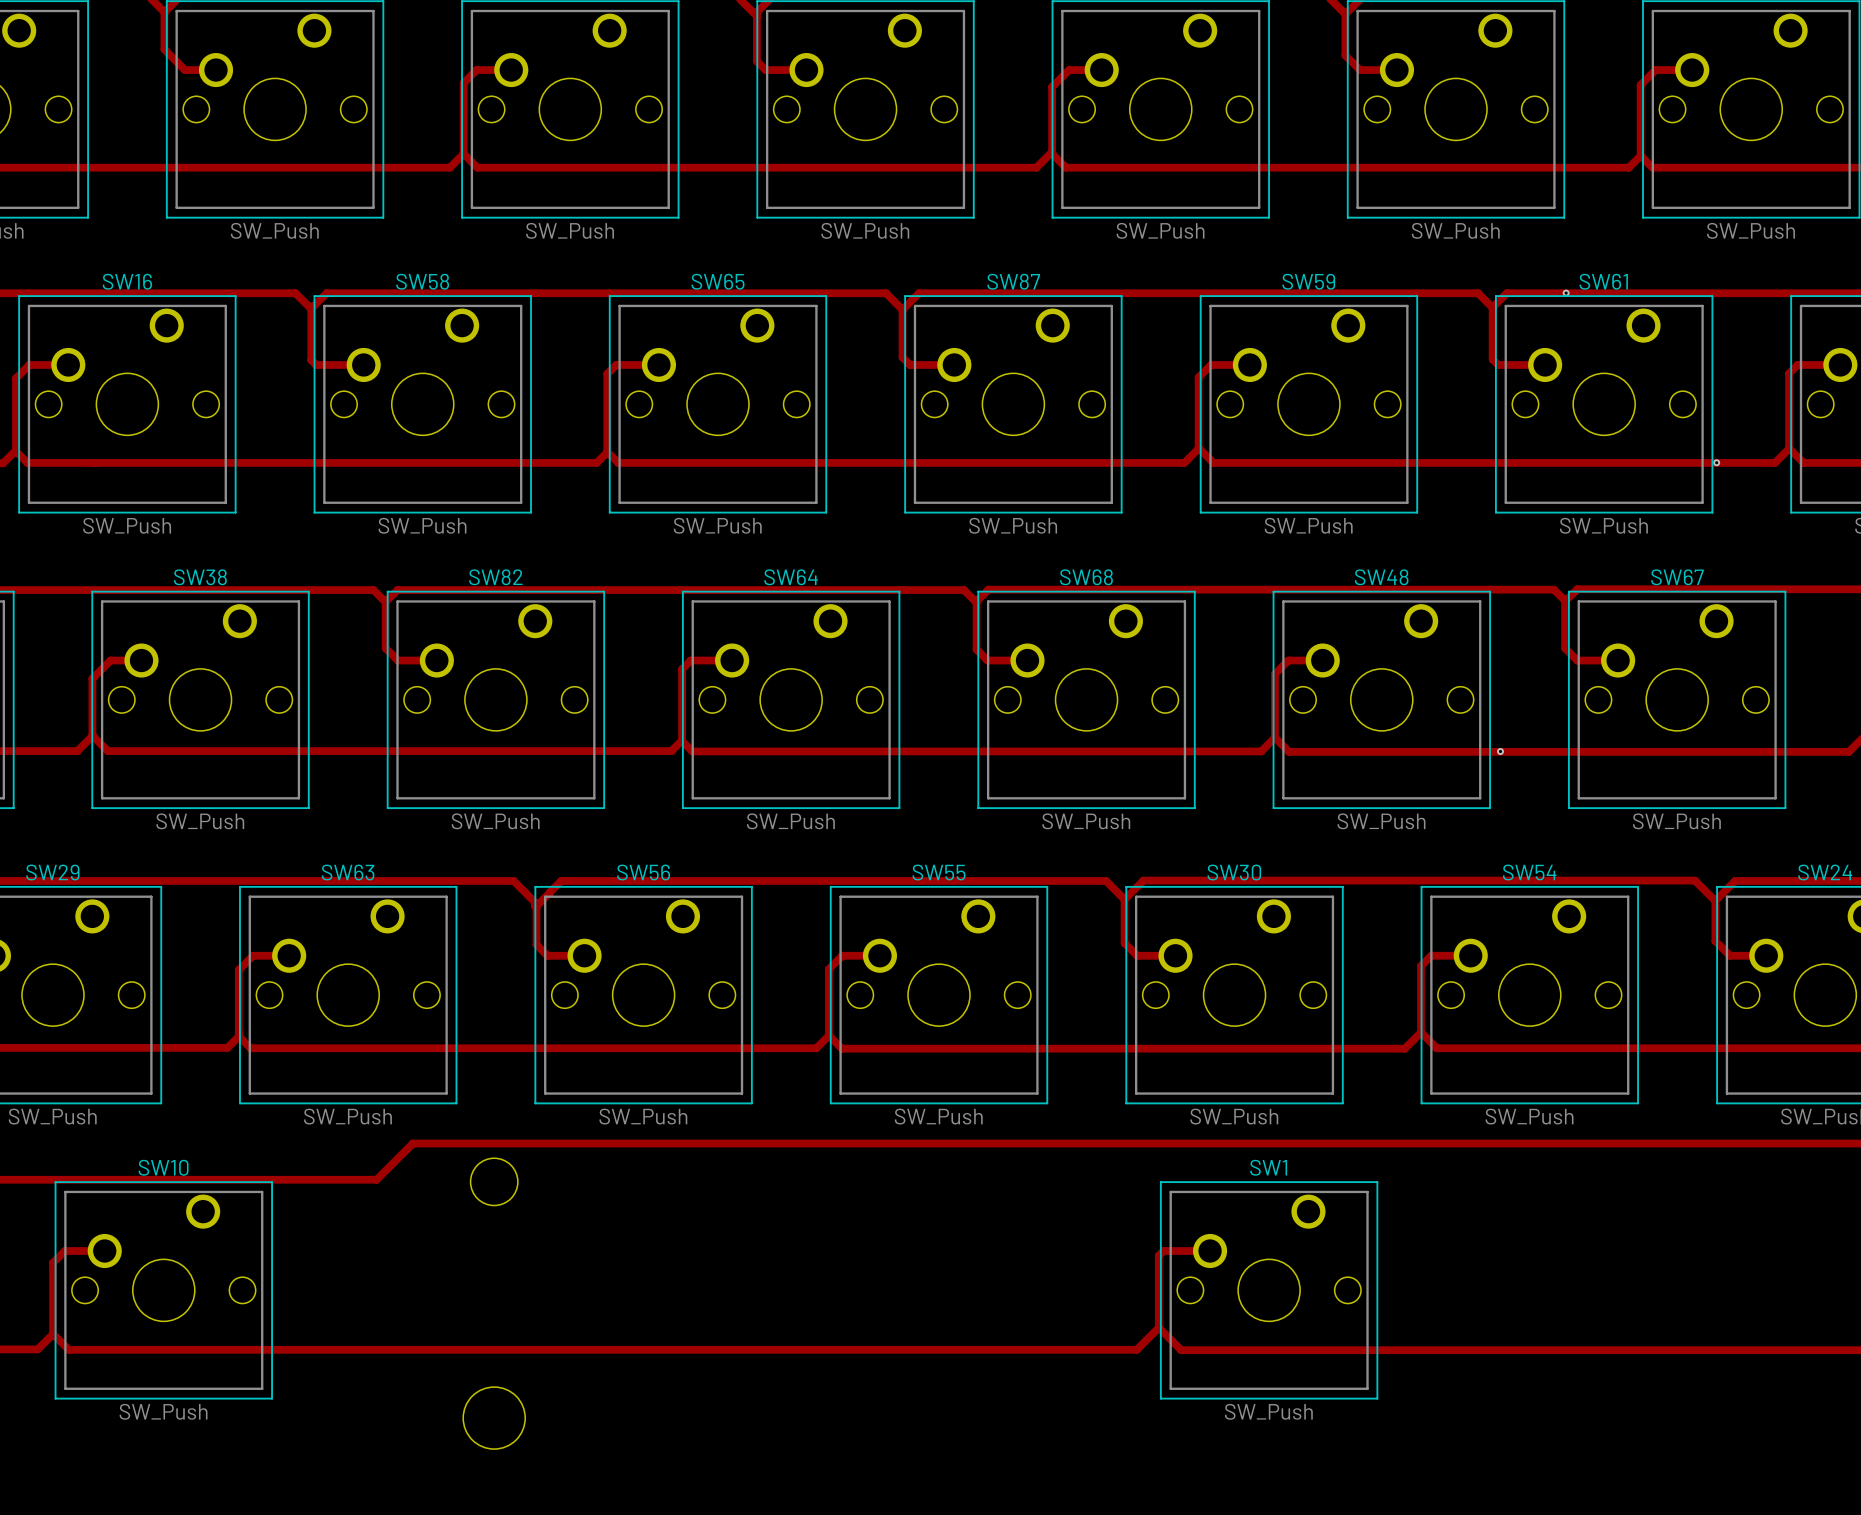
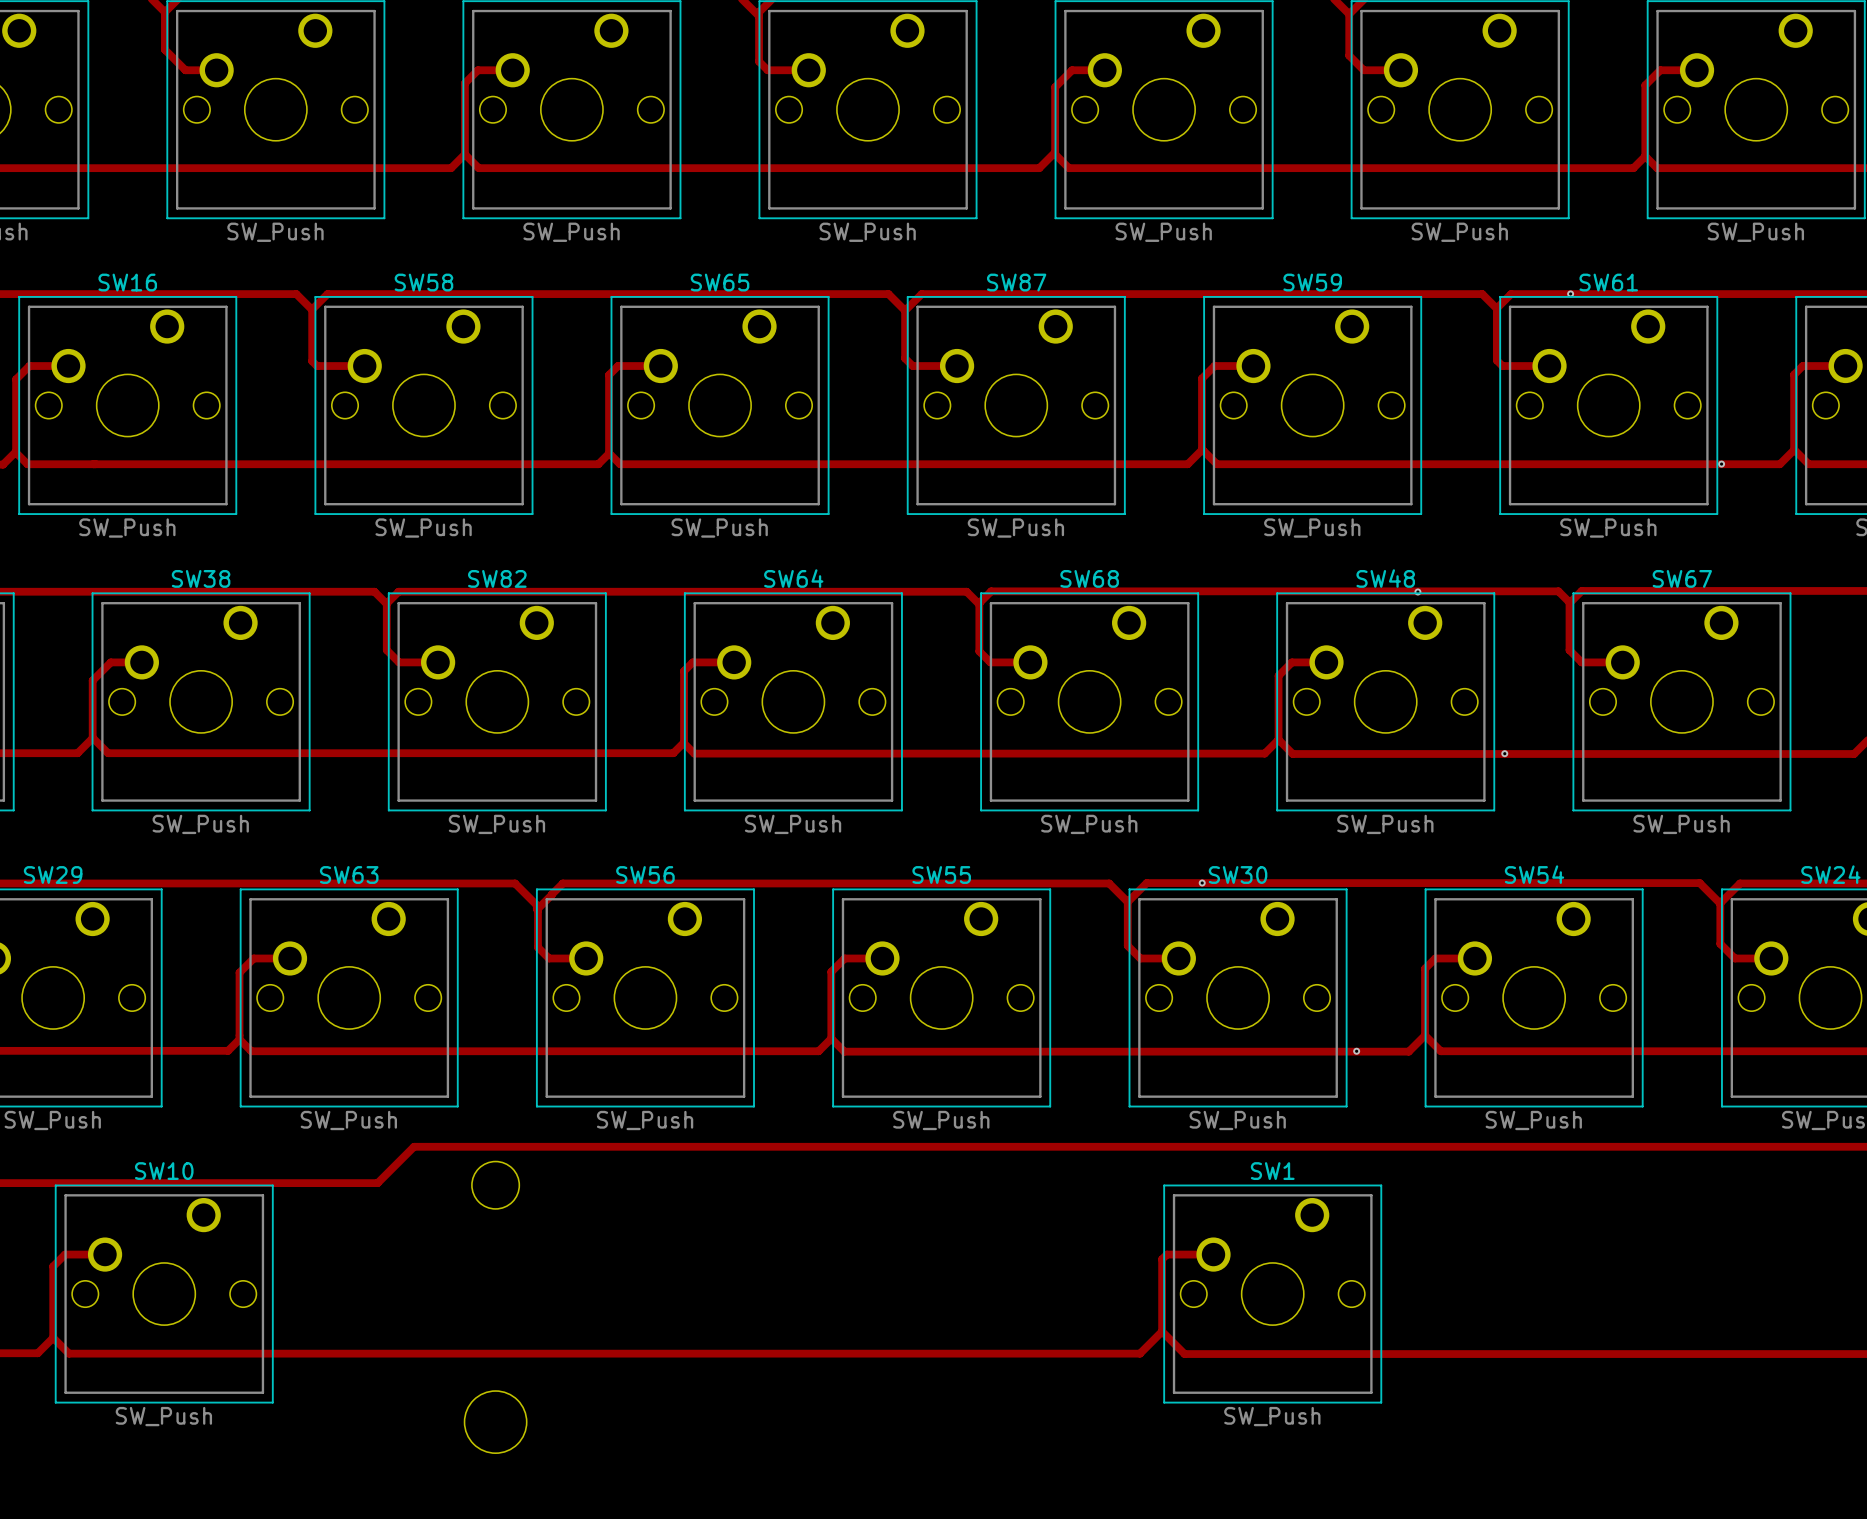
via: none -> (1417, 591)
via: none -> (1202, 883)
via: none -> (1356, 1051)

